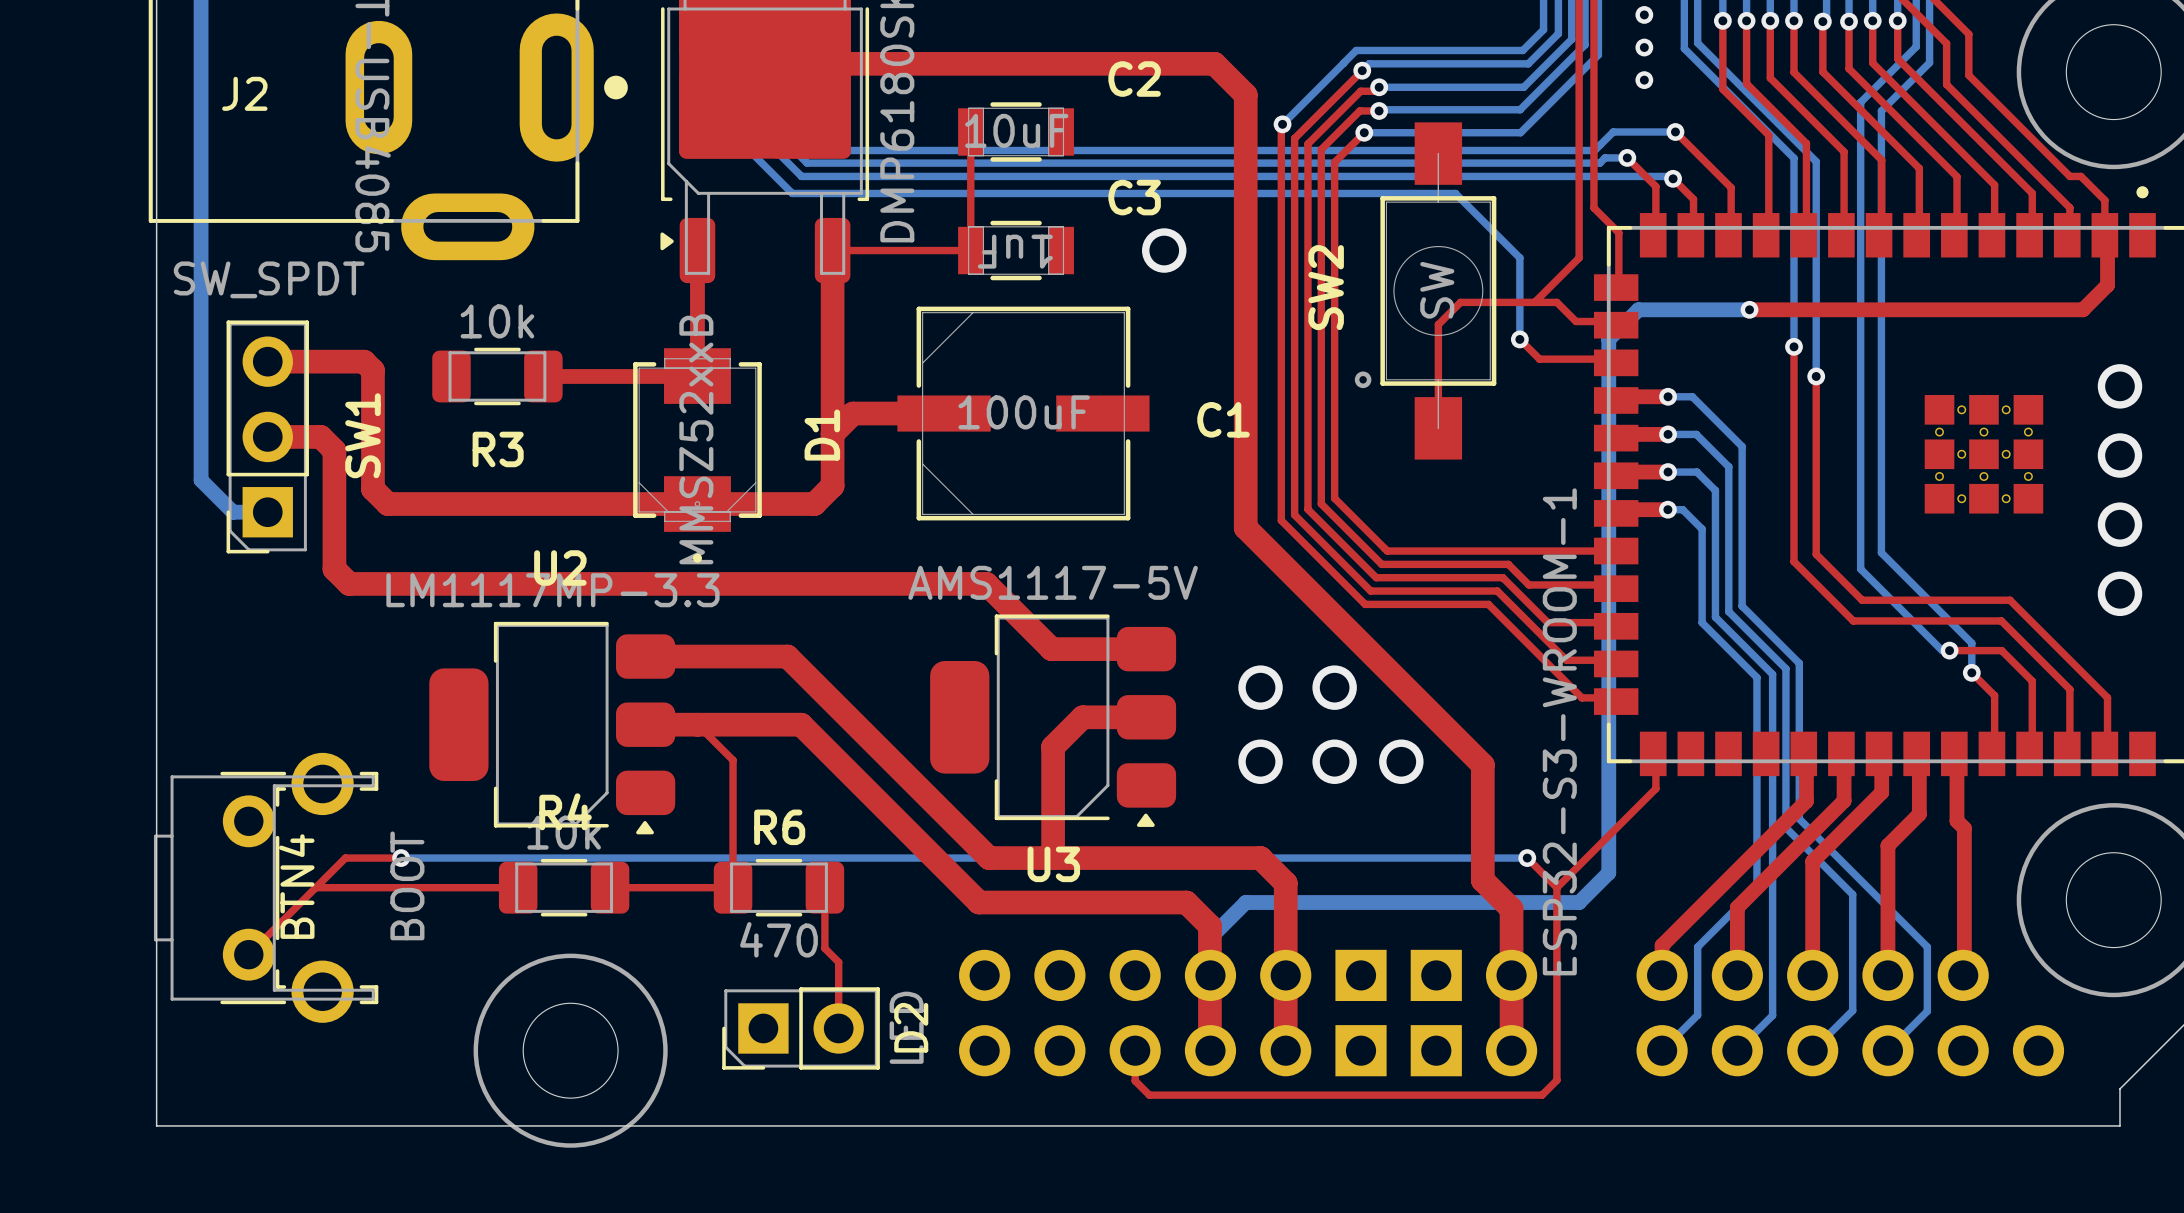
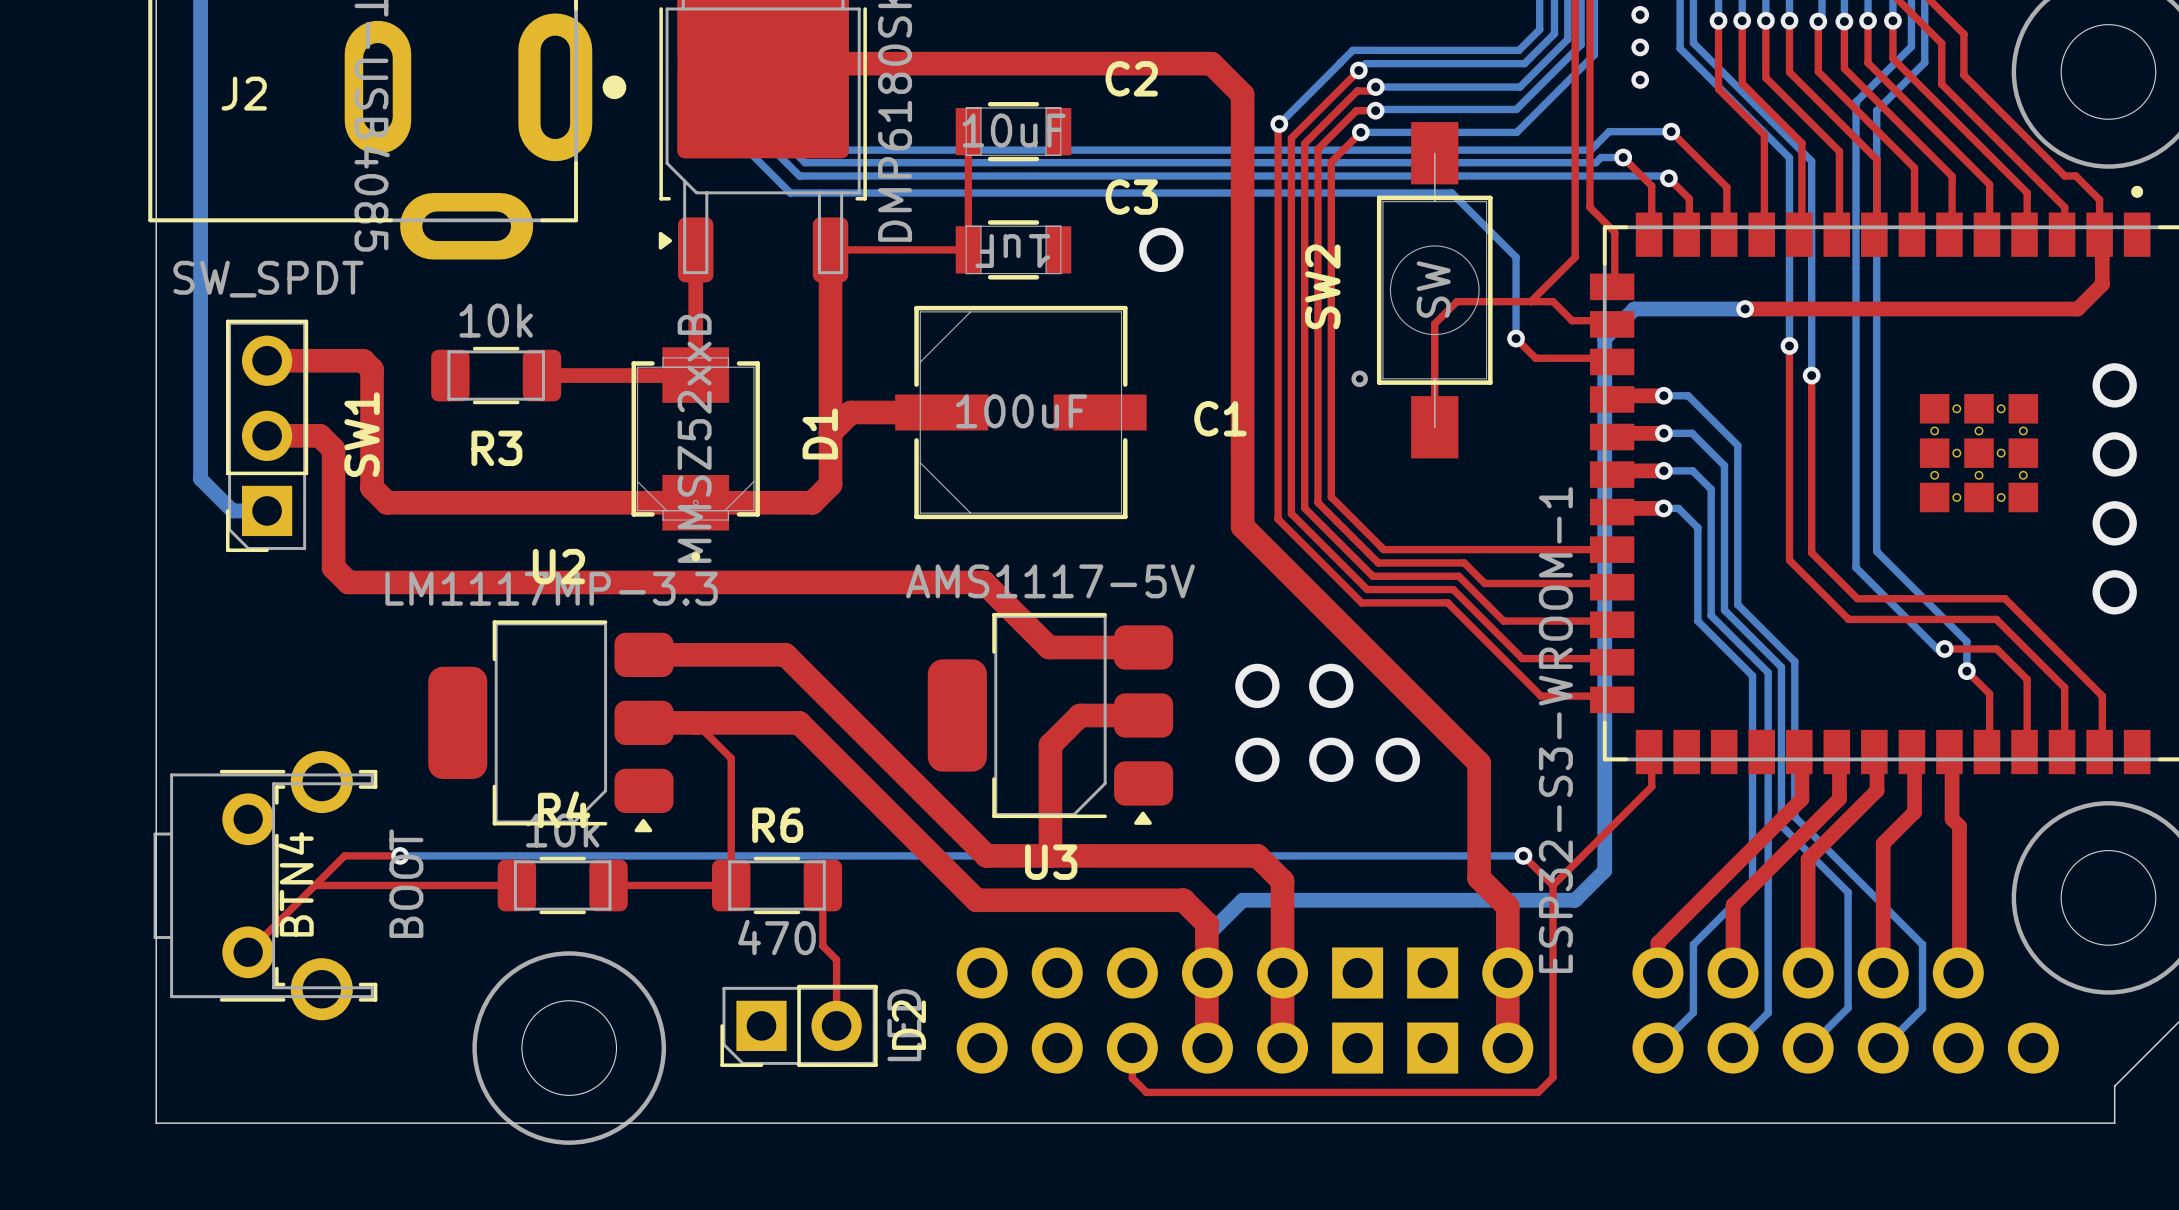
top track: (1467, 564) (1508, 564) (1528, 584) -> (1464, 562) (1484, 583) (1525, 583)
top track: (1462, 577) (1502, 577) (1547, 622) -> (1458, 576) (1503, 621) (1543, 621)
top track: (1456, 591) (1497, 591) (1566, 660) -> (1453, 589) (1522, 658) (1562, 658)
top track: (1451, 604) (1488, 604) (1581, 697) -> (1447, 602) (1541, 696) (1577, 696)

